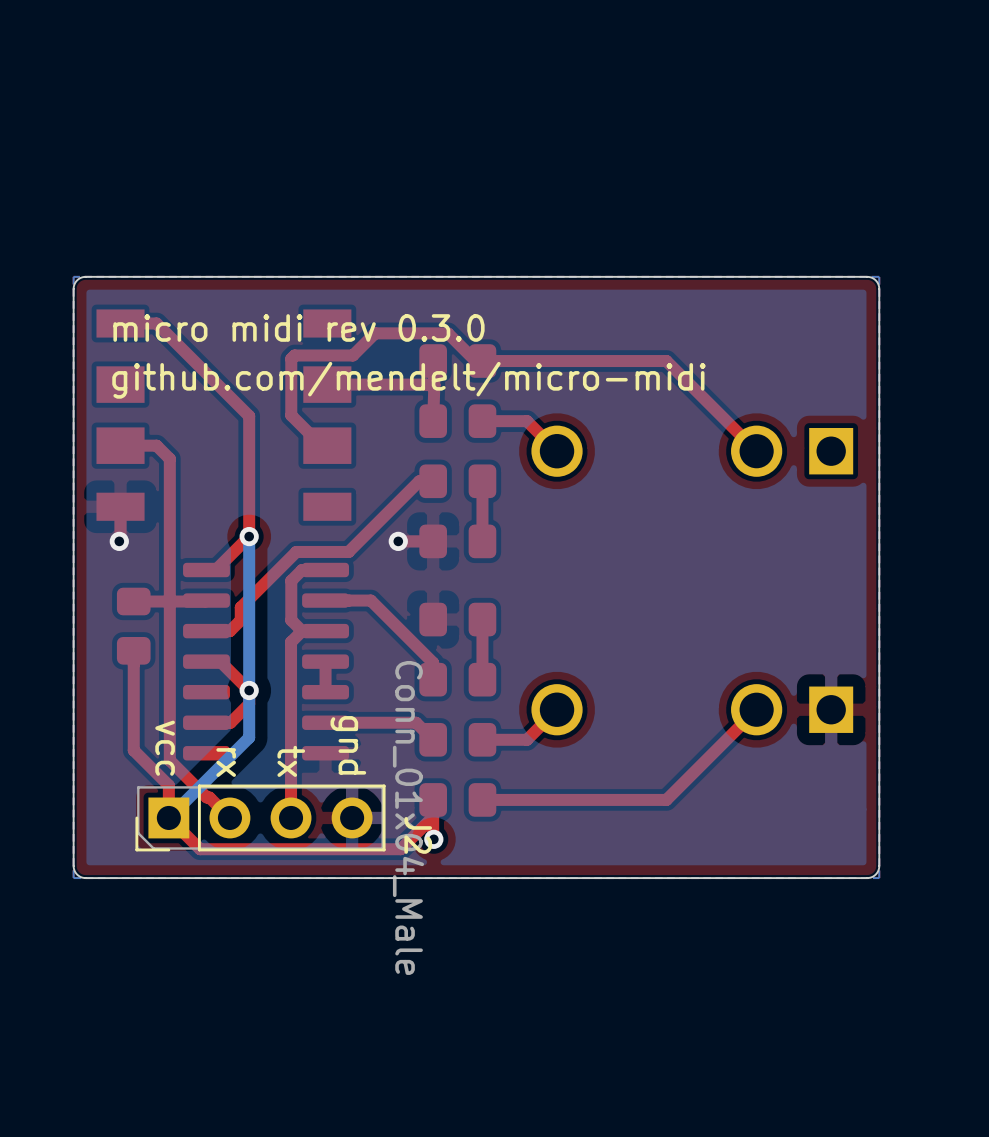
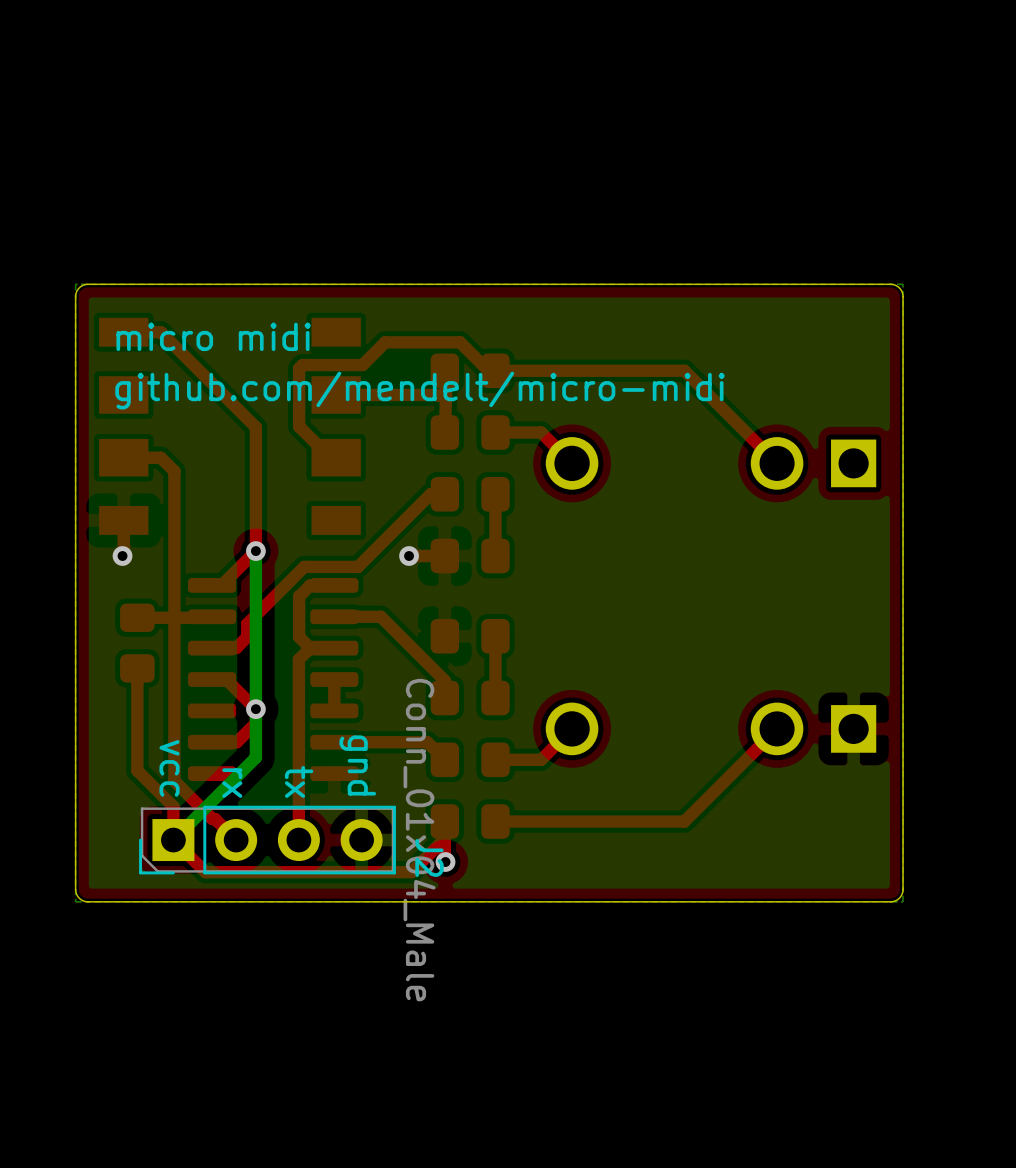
text: micro midi rev 0.3.0 (299, 327) -> micro midi (213, 336)

